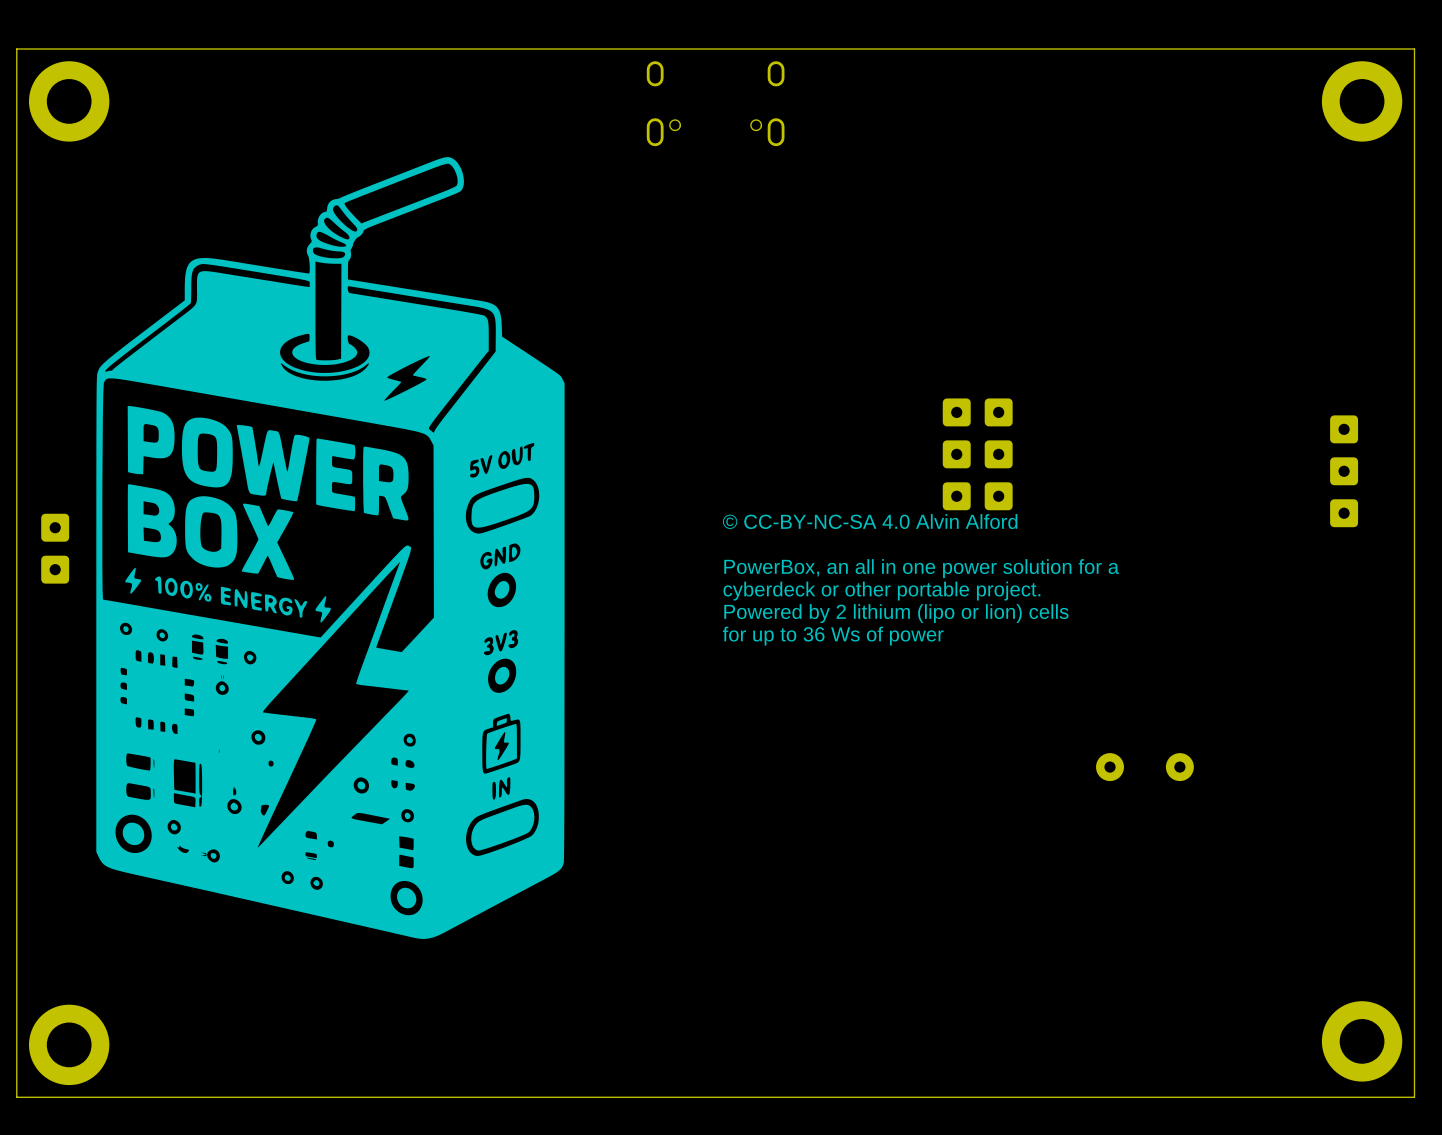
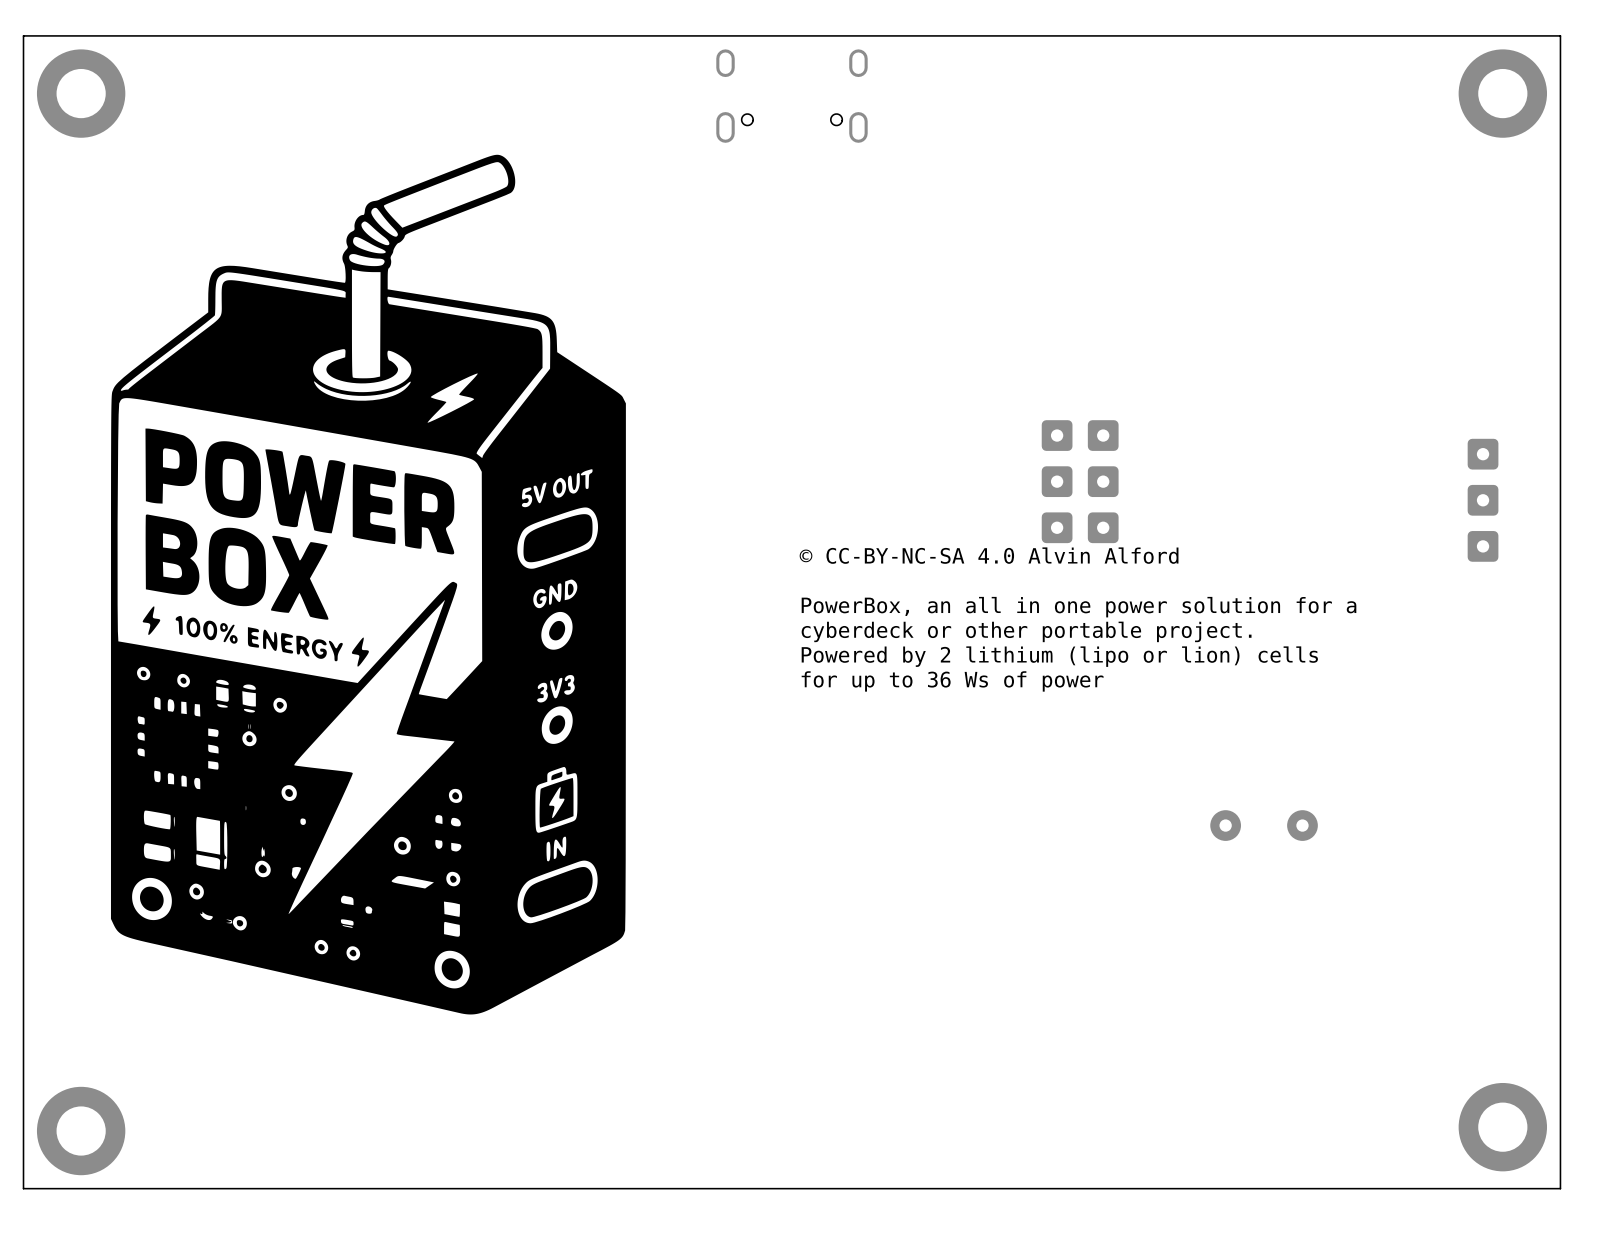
part: (55, 527) -> none
part: (55, 569) -> none

